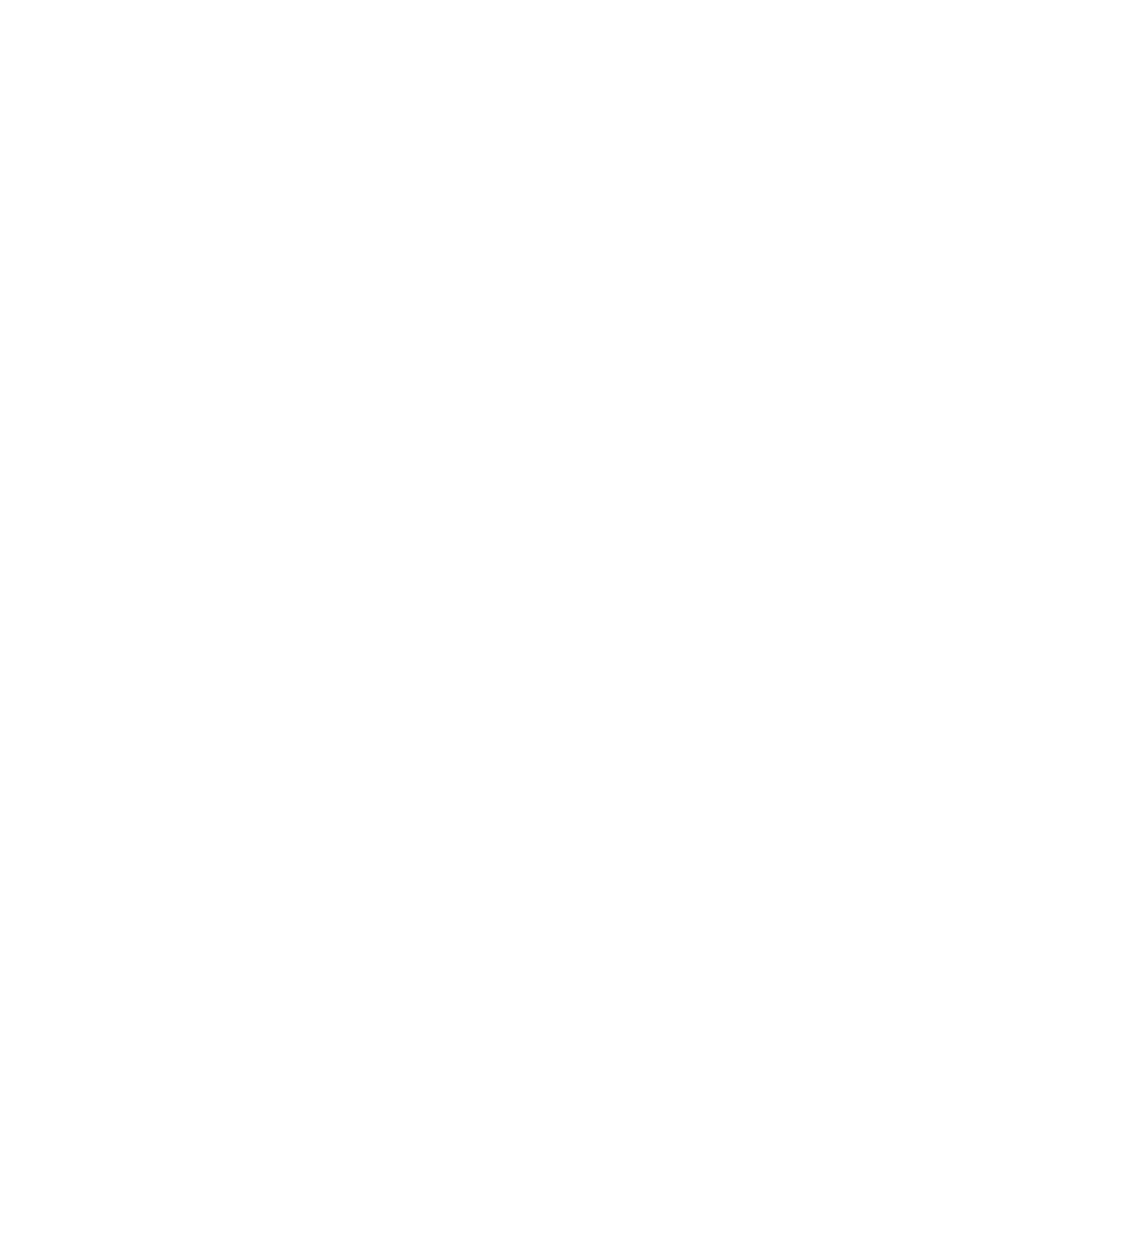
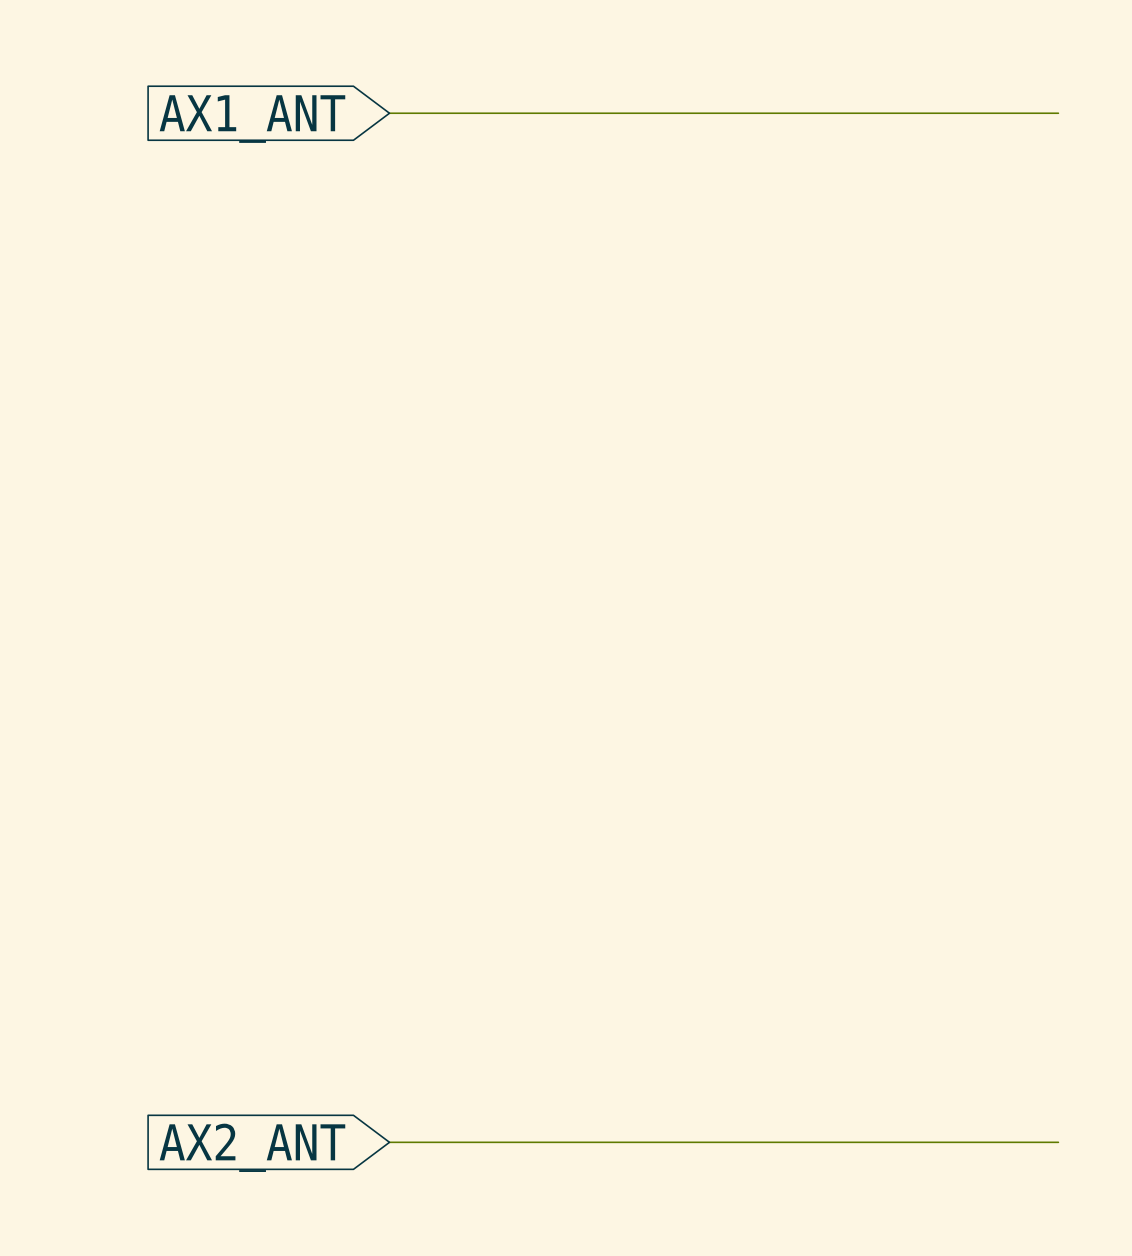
wire: none -> (389, 113) (1058, 113)
global label: none -> AX1_ANT (252, 119)
wire: none -> (389, 1142) (1058, 1142)
global label: none -> AX2_ANT (252, 1147)

